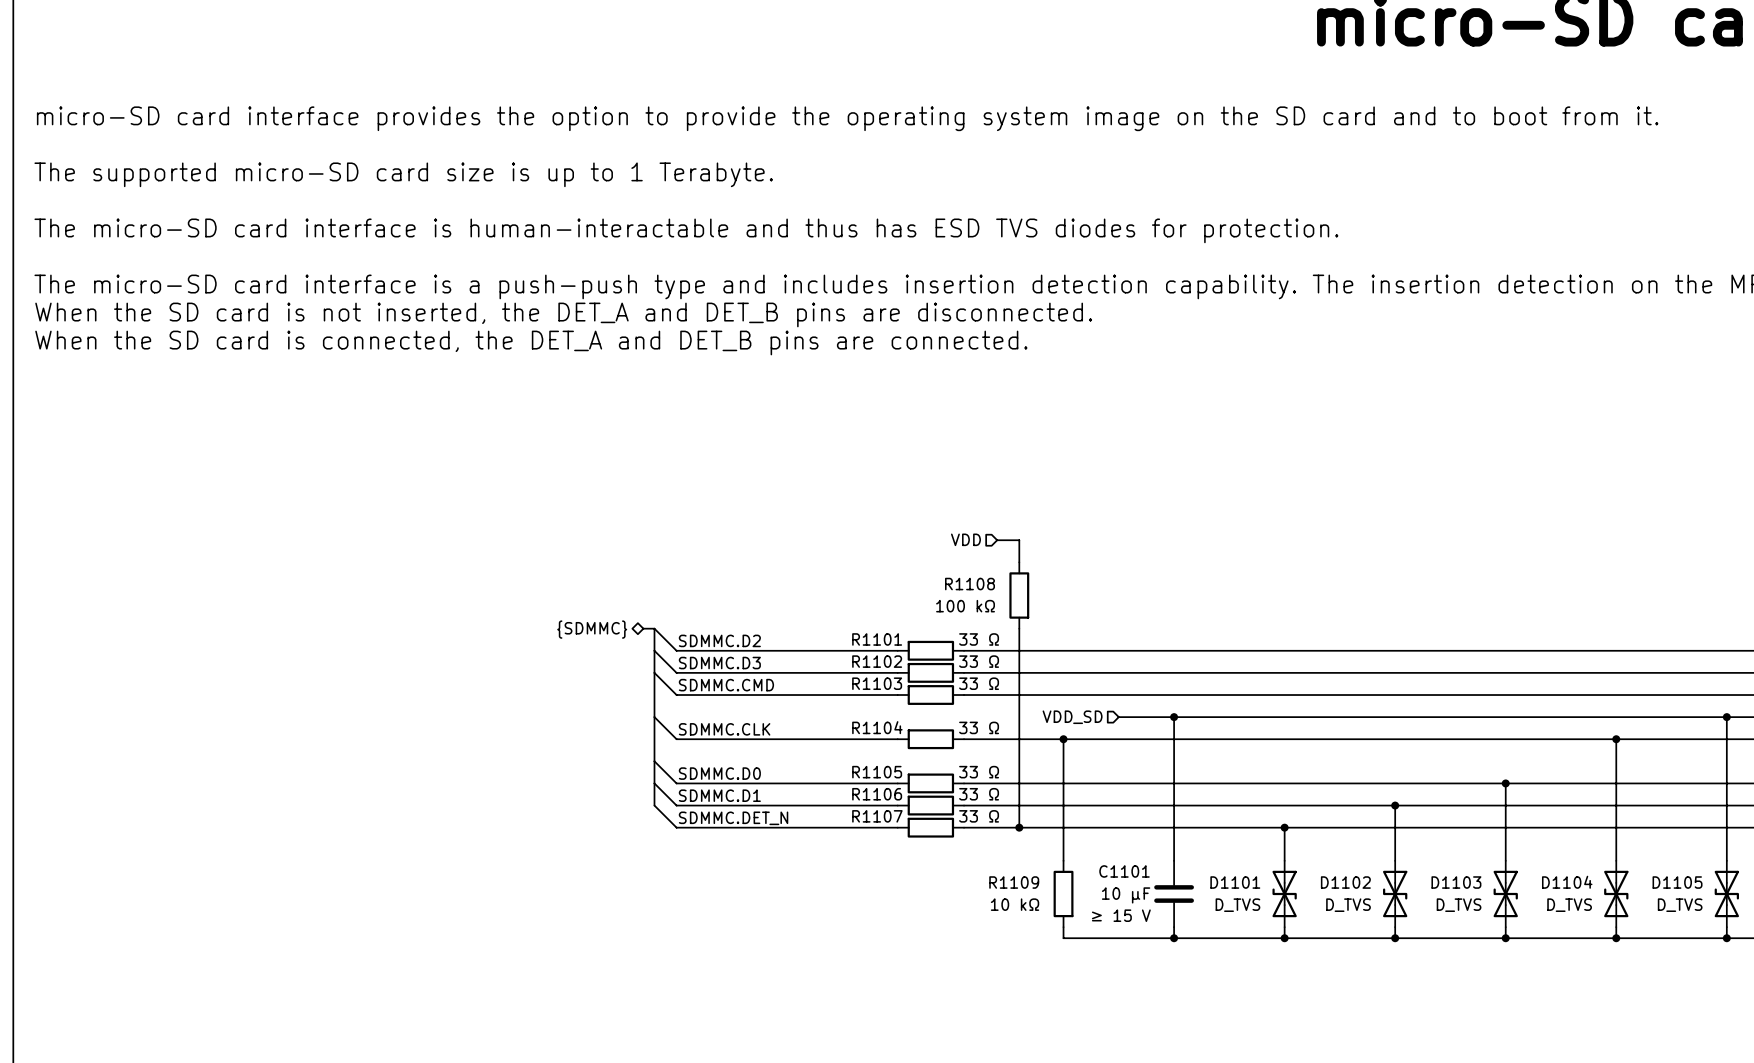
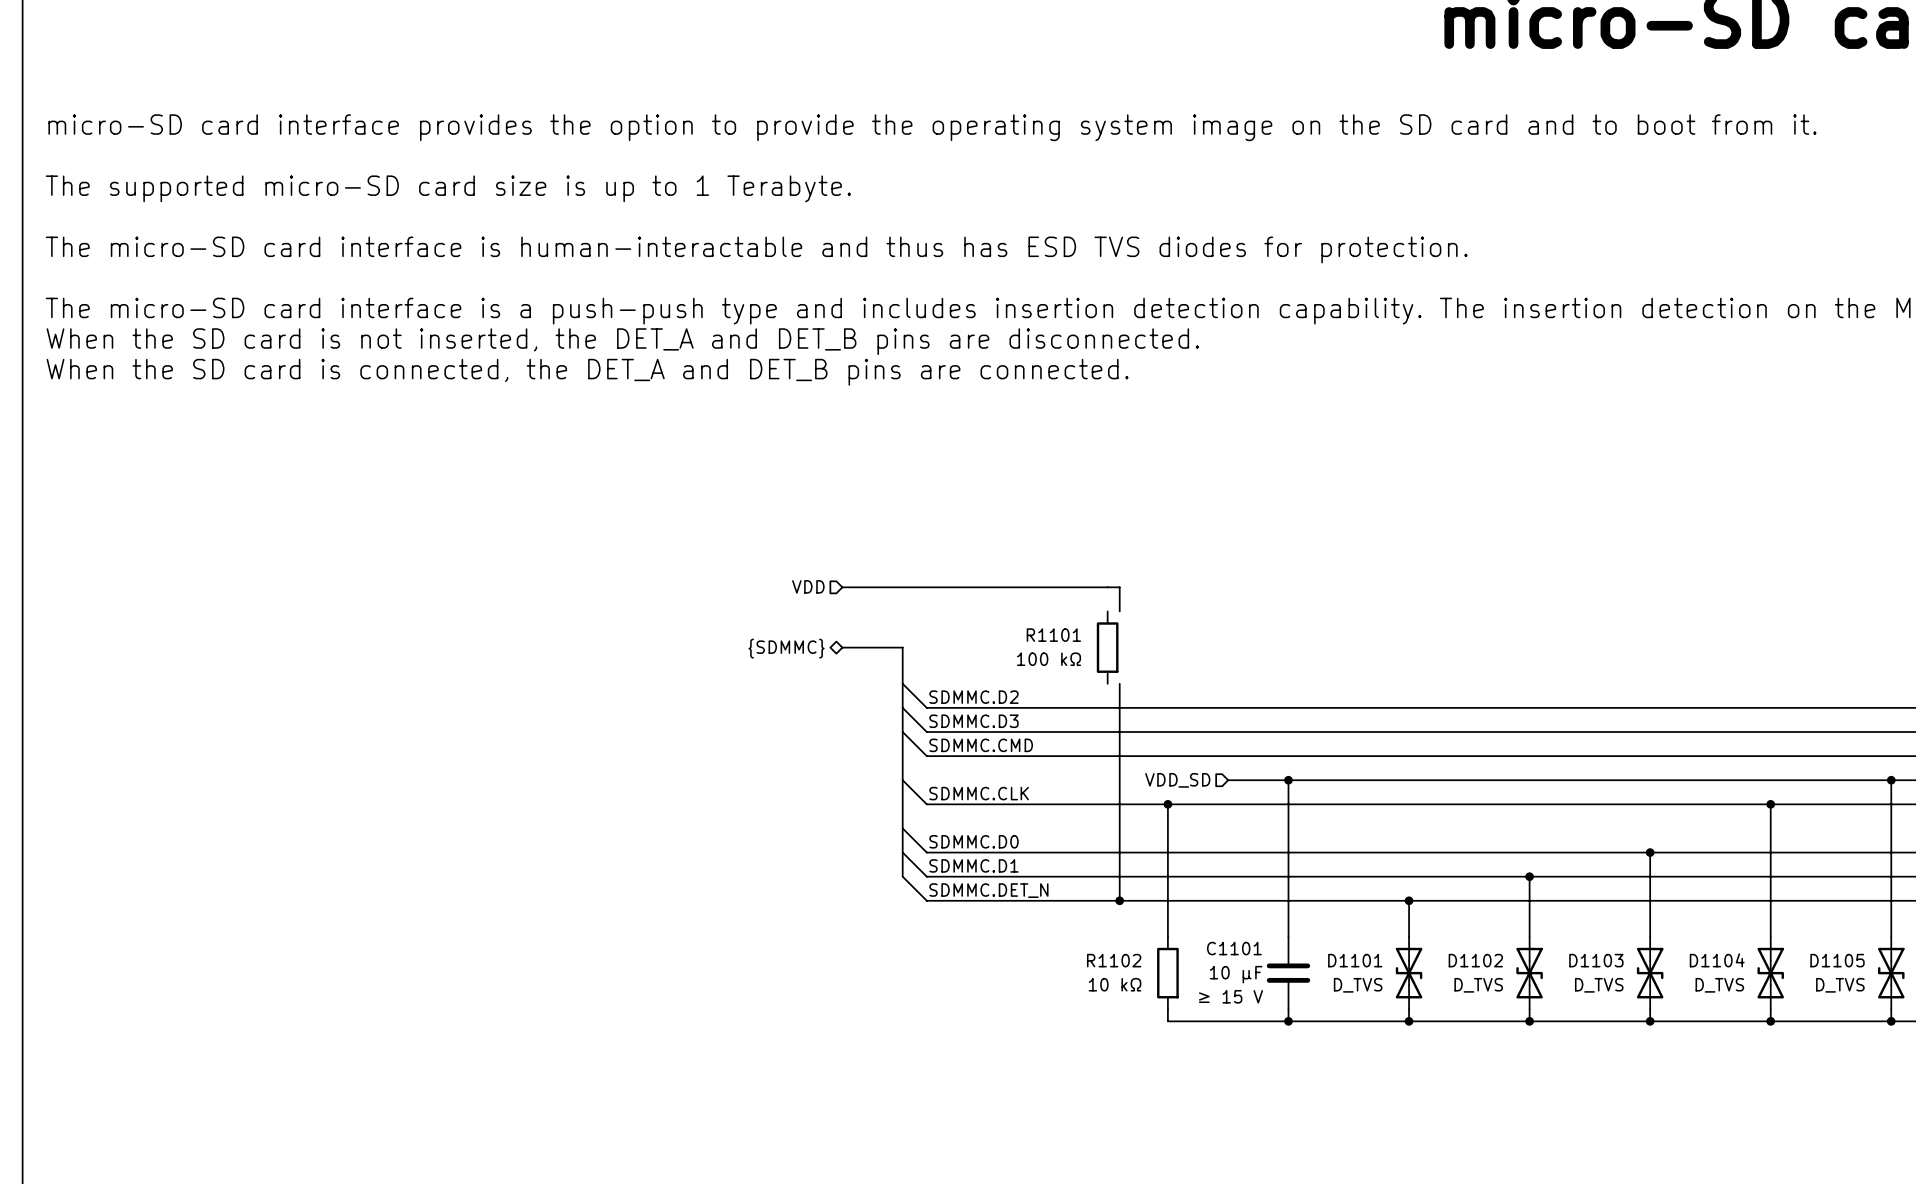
hierarchical label: none -> VDD (808, 586)
hierarchical label: VDD (965, 539) -> none
wire: none -> (842, 587) (1095, 587)
bus: none -> (842, 647) (902, 647) (902, 876)
R1108: 100 kΩ (1019, 595) -> none
bus: (643, 628) (654, 628) (654, 805) -> none
wire: (654, 628) (676, 650) (842, 650) -> (902, 683) (926, 707)
hierarchical label position: {SDMMC} (592, 629) -> {SDMMC} (786, 648)
R1101 value: 33 Ω (979, 639) -> 100 kΩ (1049, 659)
label position: SDMMC.D2 (719, 640) -> SDMMC.D2 (973, 697)
wire: (654, 650) (676, 672) (842, 672) -> (902, 707) (926, 732)
wire: none -> (987, 707) (1059, 707)
R1101 rotation: 0° (930, 650) -> 90° clockwise (1107, 647)
R1101 position: (930, 650) -> (1107, 647)
label position: SDMMC.D3 (719, 663) -> SDMMC.D3 (973, 721)
wire: (654, 672) (676, 695) (842, 695) -> (902, 732) (926, 756)
wire: none -> (987, 732) (1059, 732)
R1102: 33 Ω (930, 672) -> none
label position: SDMMC.CMD (726, 685) -> SDMMC.CMD (981, 745)
wire: none -> (987, 756) (1059, 756)
R1103: 33 Ω (930, 695) -> none
wire: (654, 717) (676, 739) (842, 739) -> (902, 780) (926, 804)
label position: SDMMC.CLK (724, 729) -> SDMMC.CLK (979, 793)
wire: none -> (987, 804) (1059, 804)
R1104: 33 Ω (930, 739) -> none
wire: (654, 761) (676, 783) (842, 783) -> (902, 828) (926, 852)
label position: SDMMC.D0 (719, 773) -> SDMMC.D0 (973, 841)
wire: (654, 783) (676, 805) (842, 805) -> (902, 852) (926, 876)
wire: none -> (987, 852) (1059, 852)
R1105: 33 Ω (930, 783) -> none
label position: SDMMC.D1 (719, 795) -> SDMMC.D1 (973, 865)
wire: (654, 805) (676, 827) (842, 827) -> (902, 876) (926, 900)
wire: none -> (987, 876) (1059, 876)
R1106: 33 Ω (930, 805) -> none
label position: SDMMC.DET_N (733, 818) -> SDMMC.DET_N (988, 890)
wire: none -> (987, 900) (1059, 900)
R1107: 33 Ω (930, 827) -> none
R1109 name: R1109 (1014, 882) -> R1102 (1114, 960)

